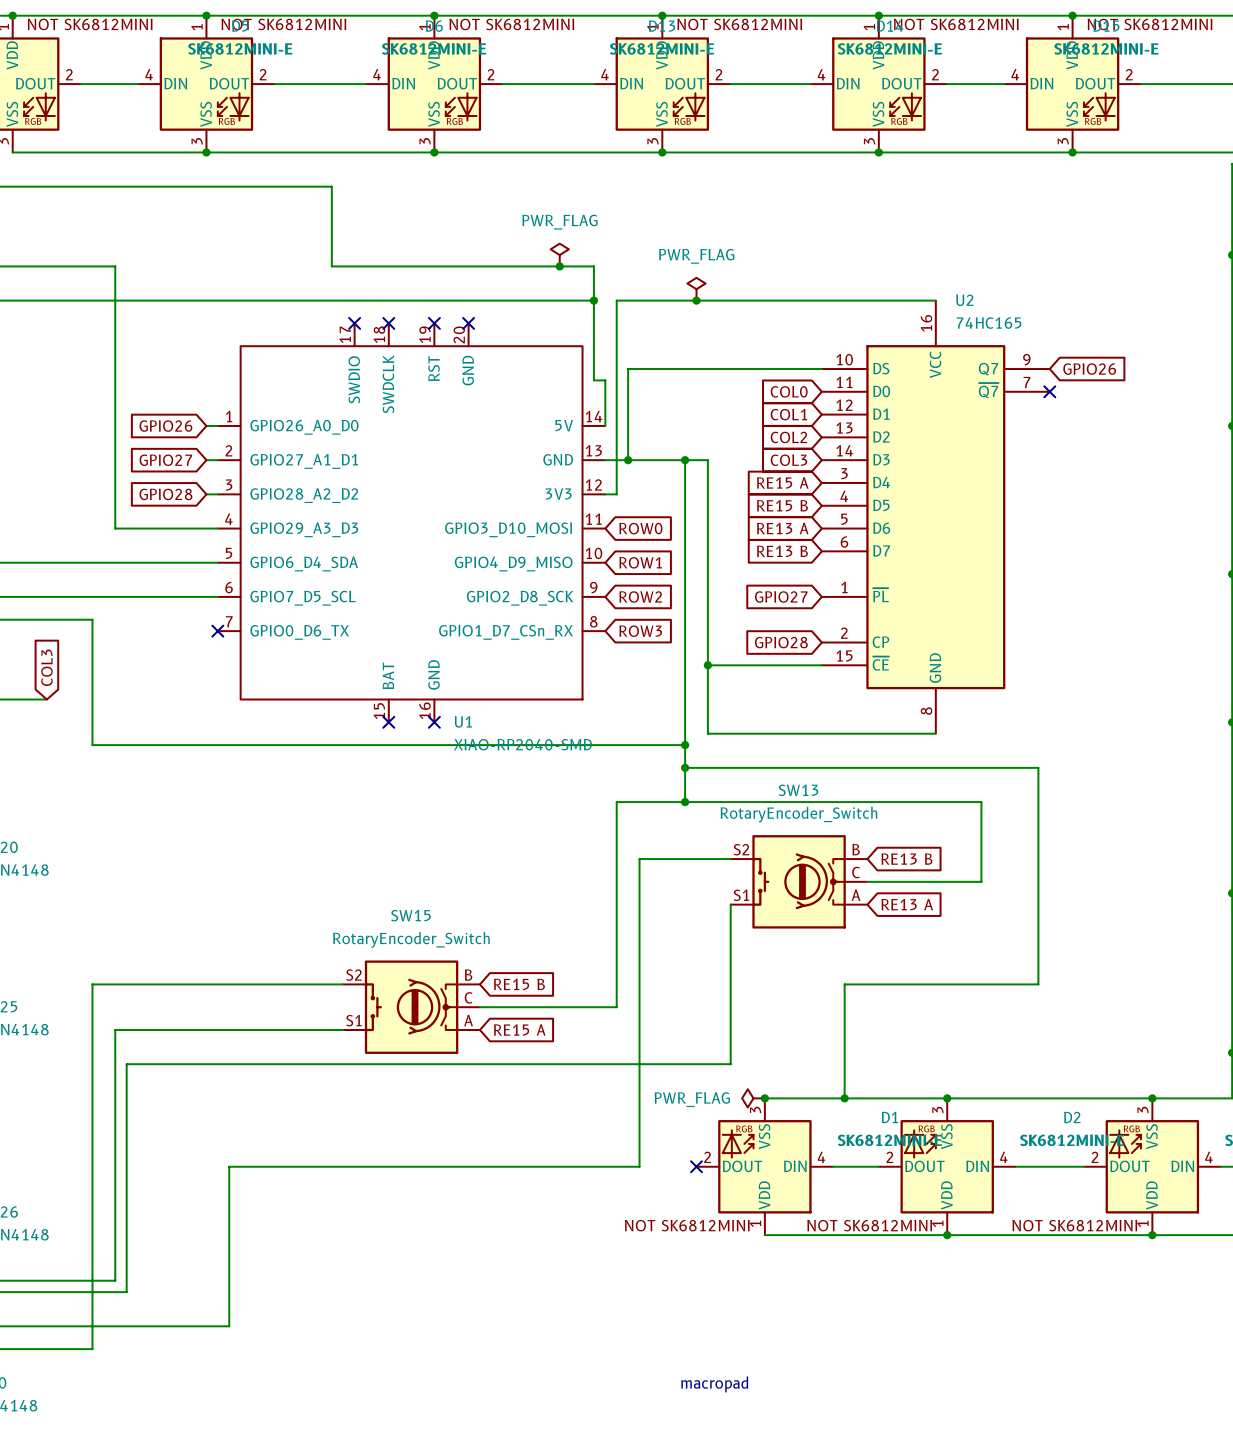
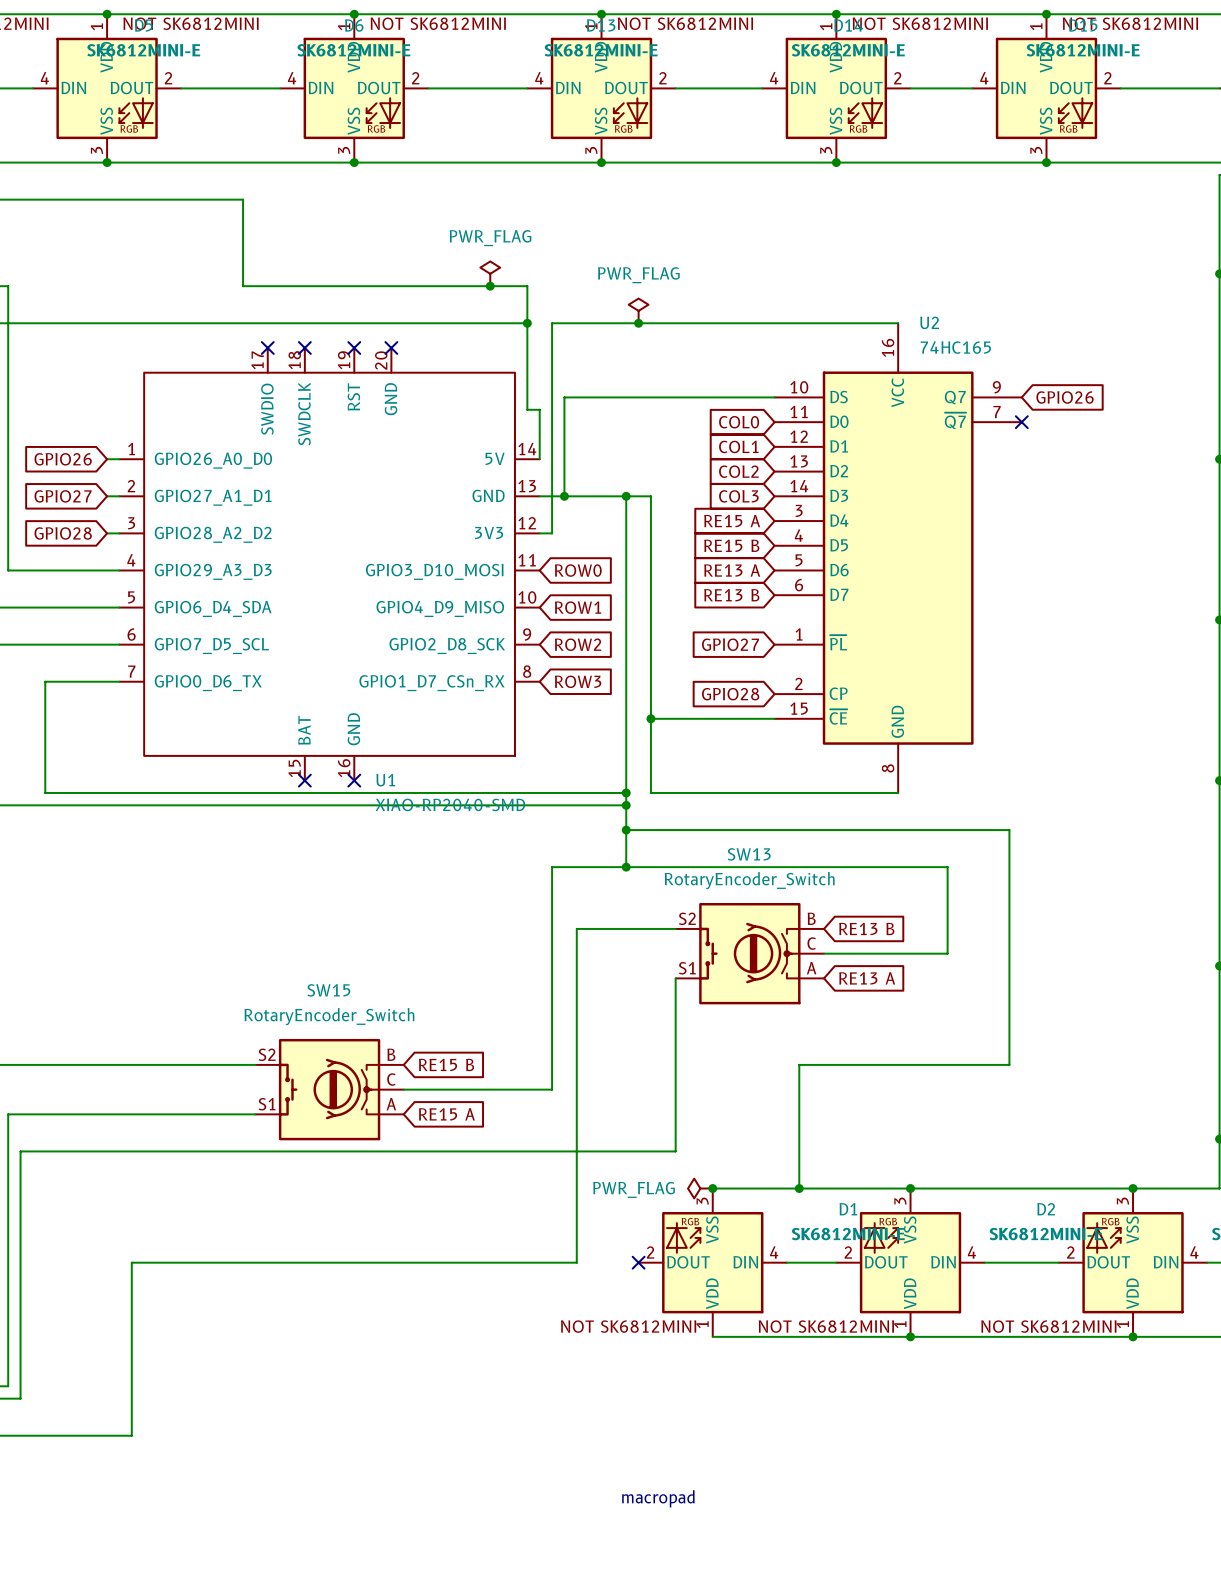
wire: none -> (119, 681) (45, 681) (45, 792) (626, 792)
no-connect mark: (217, 631) -> none
junction: none -> (626, 792)

